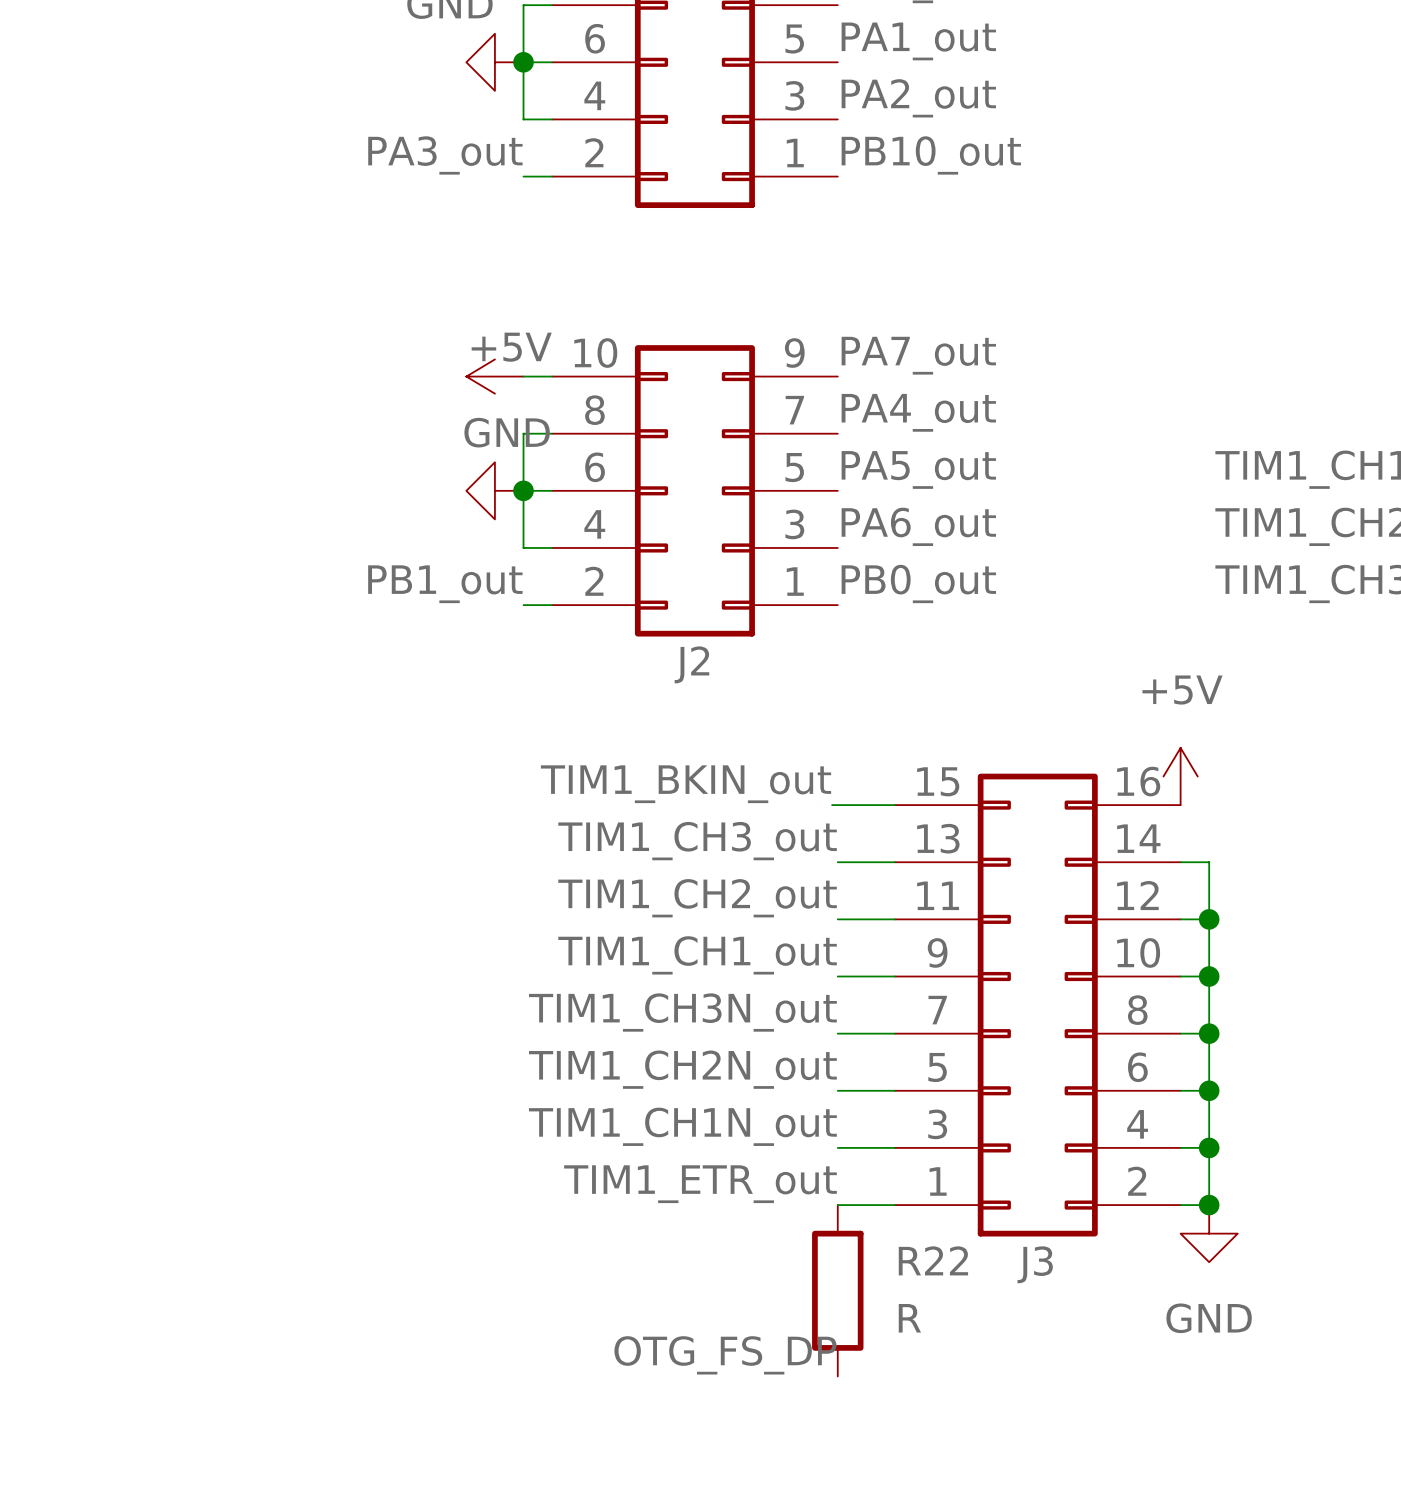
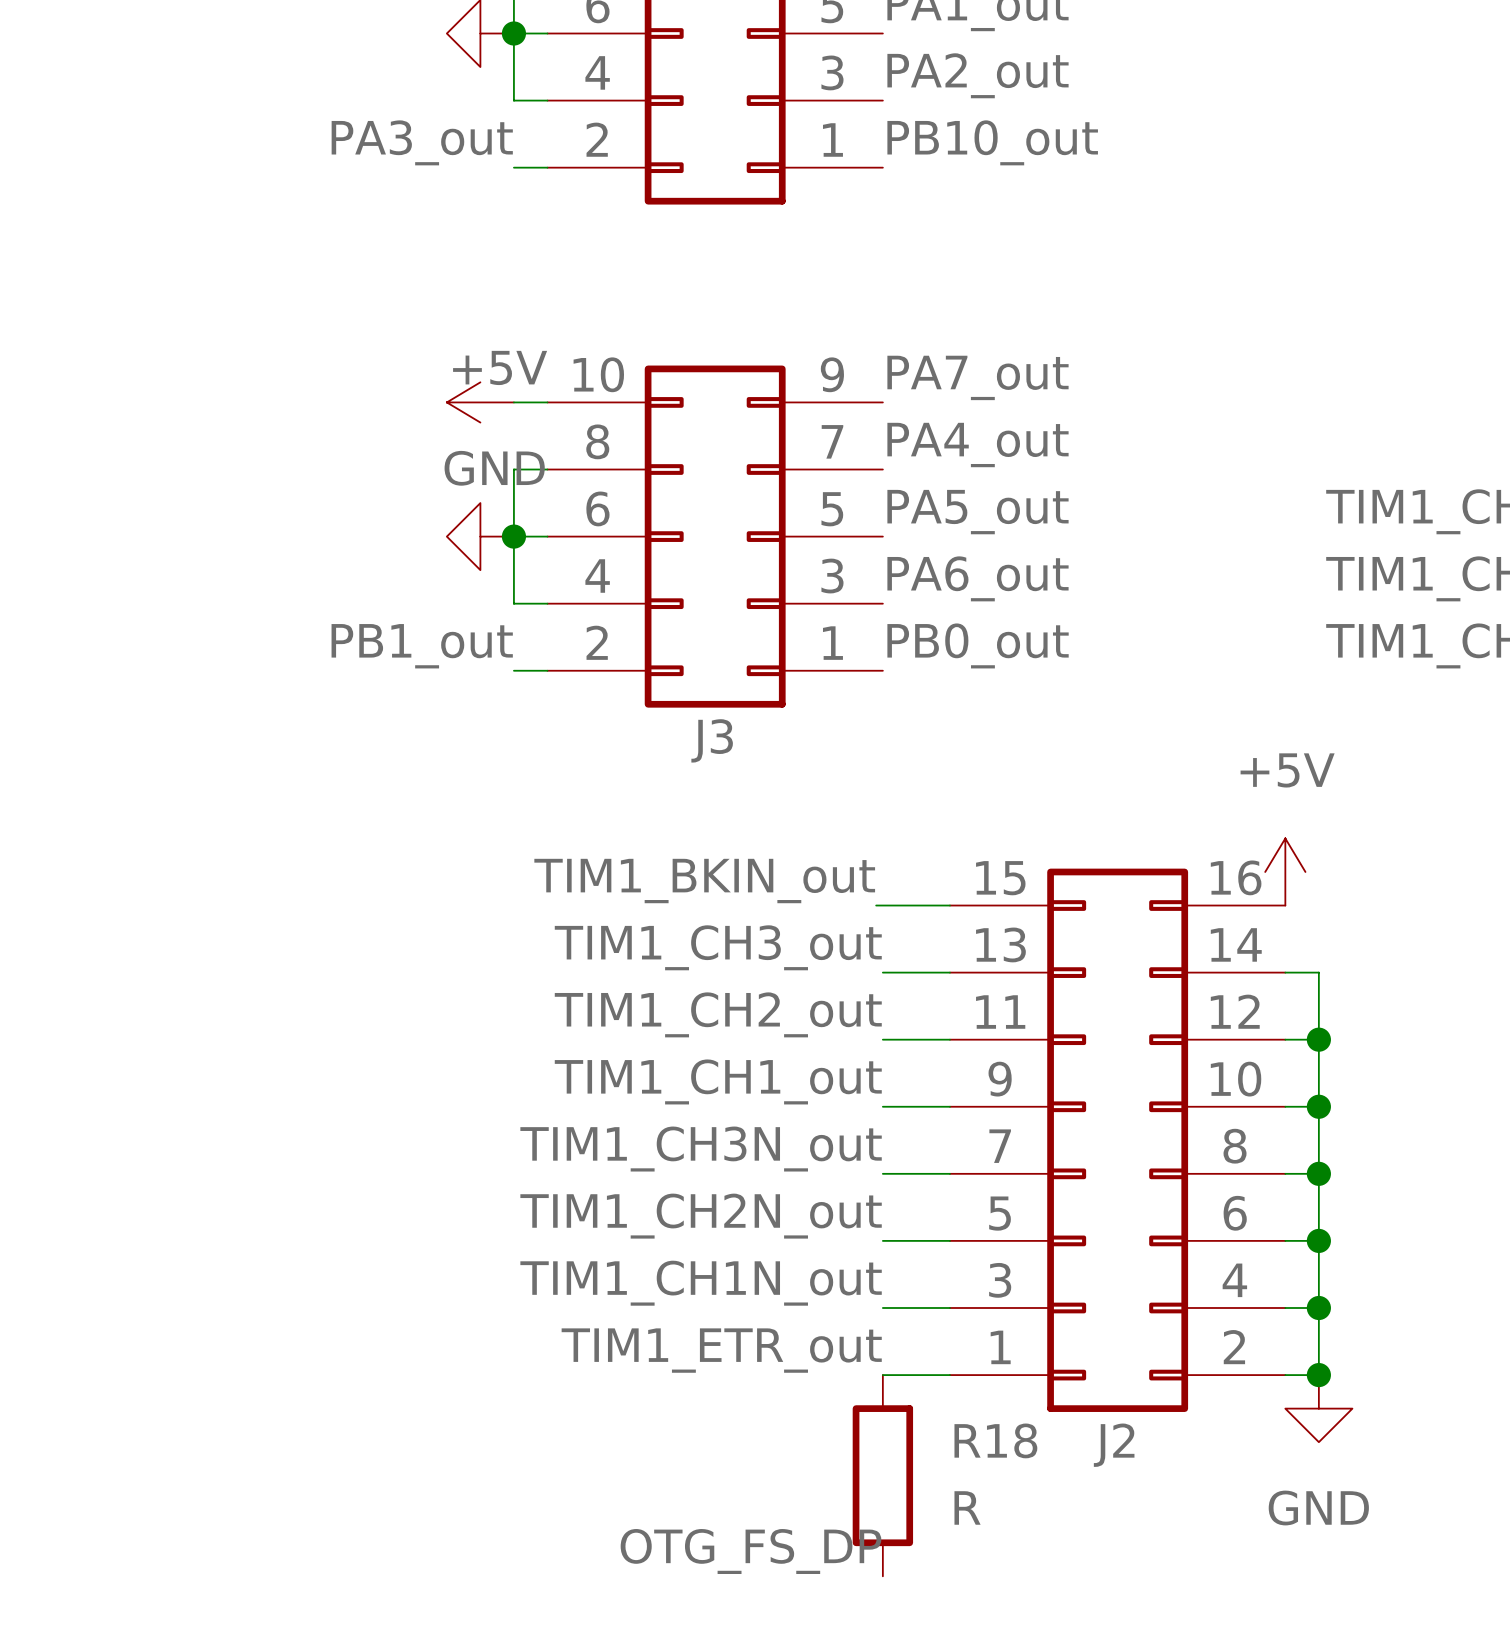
J2 name: J2 (691, 664) -> J3 (712, 740)
R22 name: R22 (933, 1260) -> R18 (995, 1440)
J3 name: J3 (1035, 1264) -> J2 (1114, 1445)

